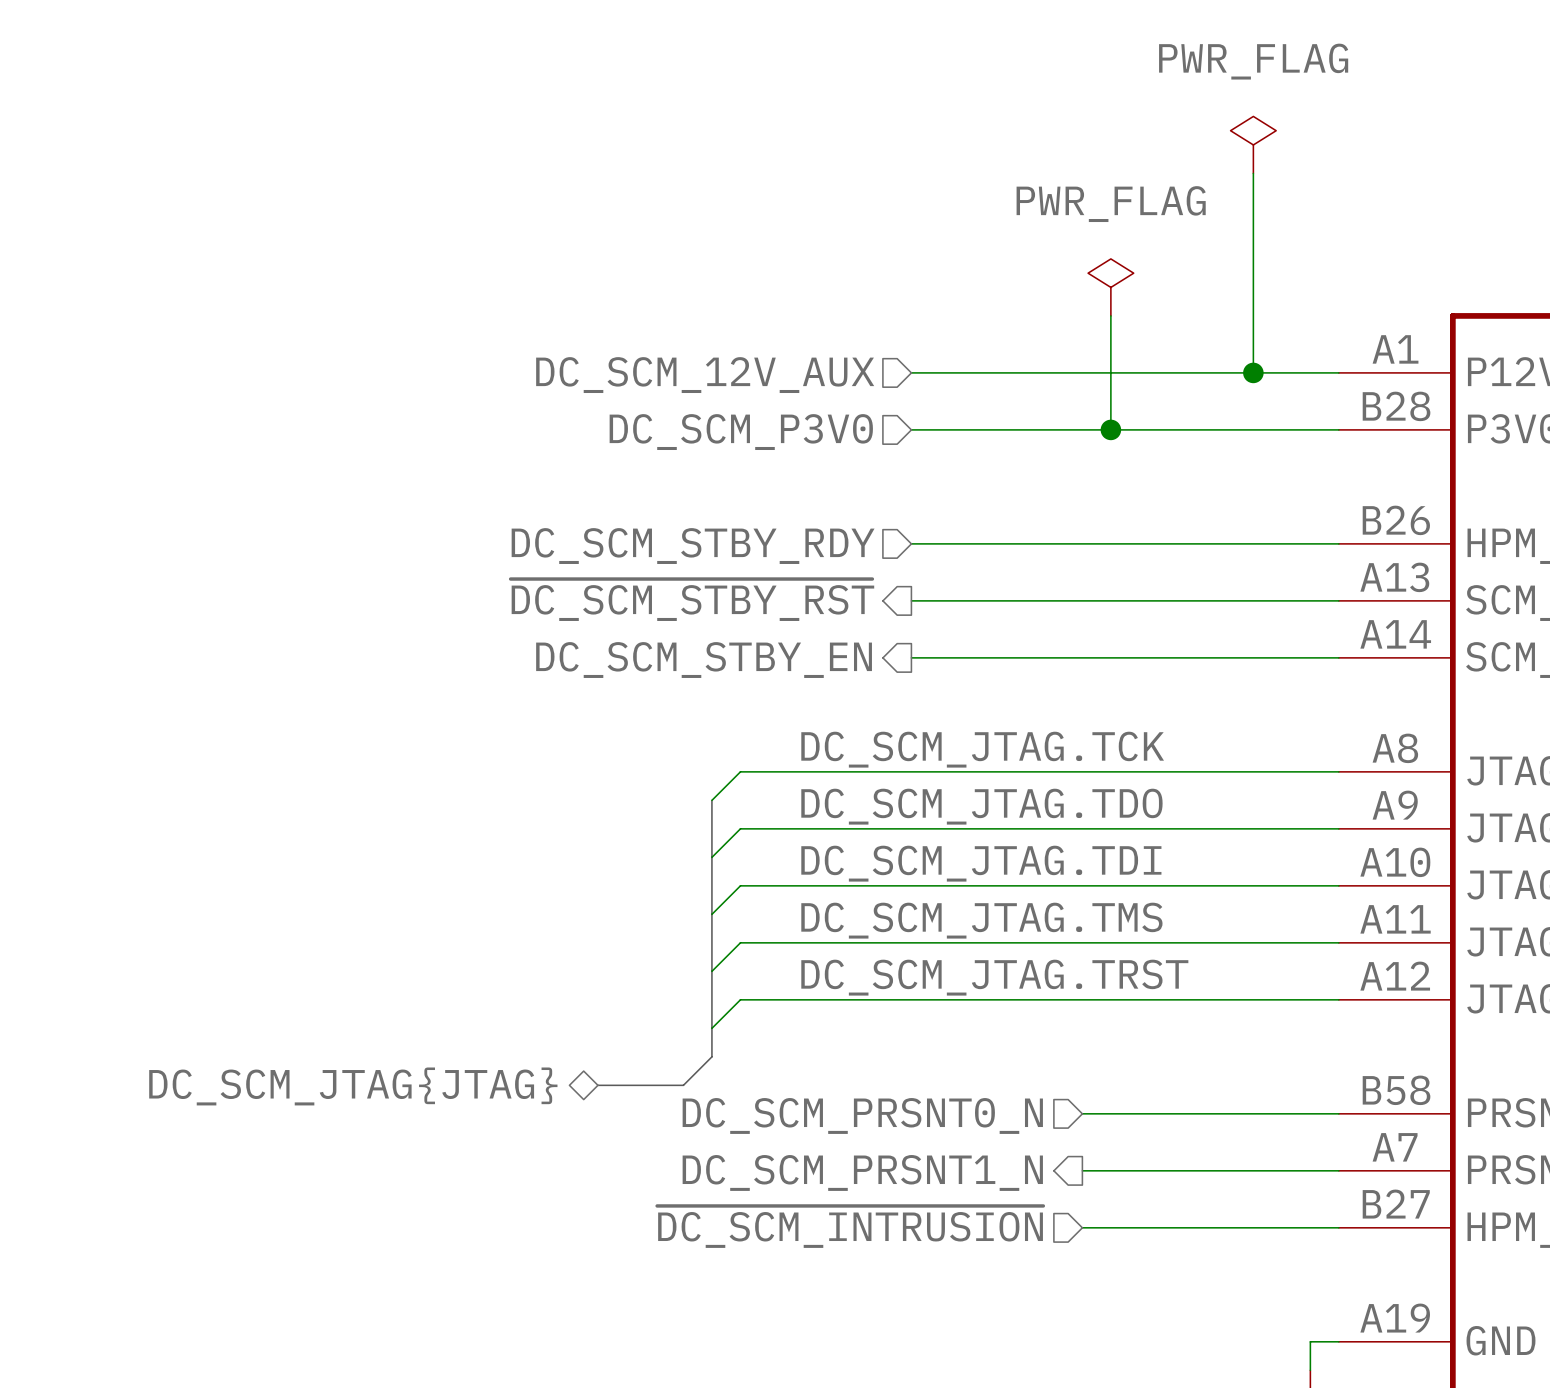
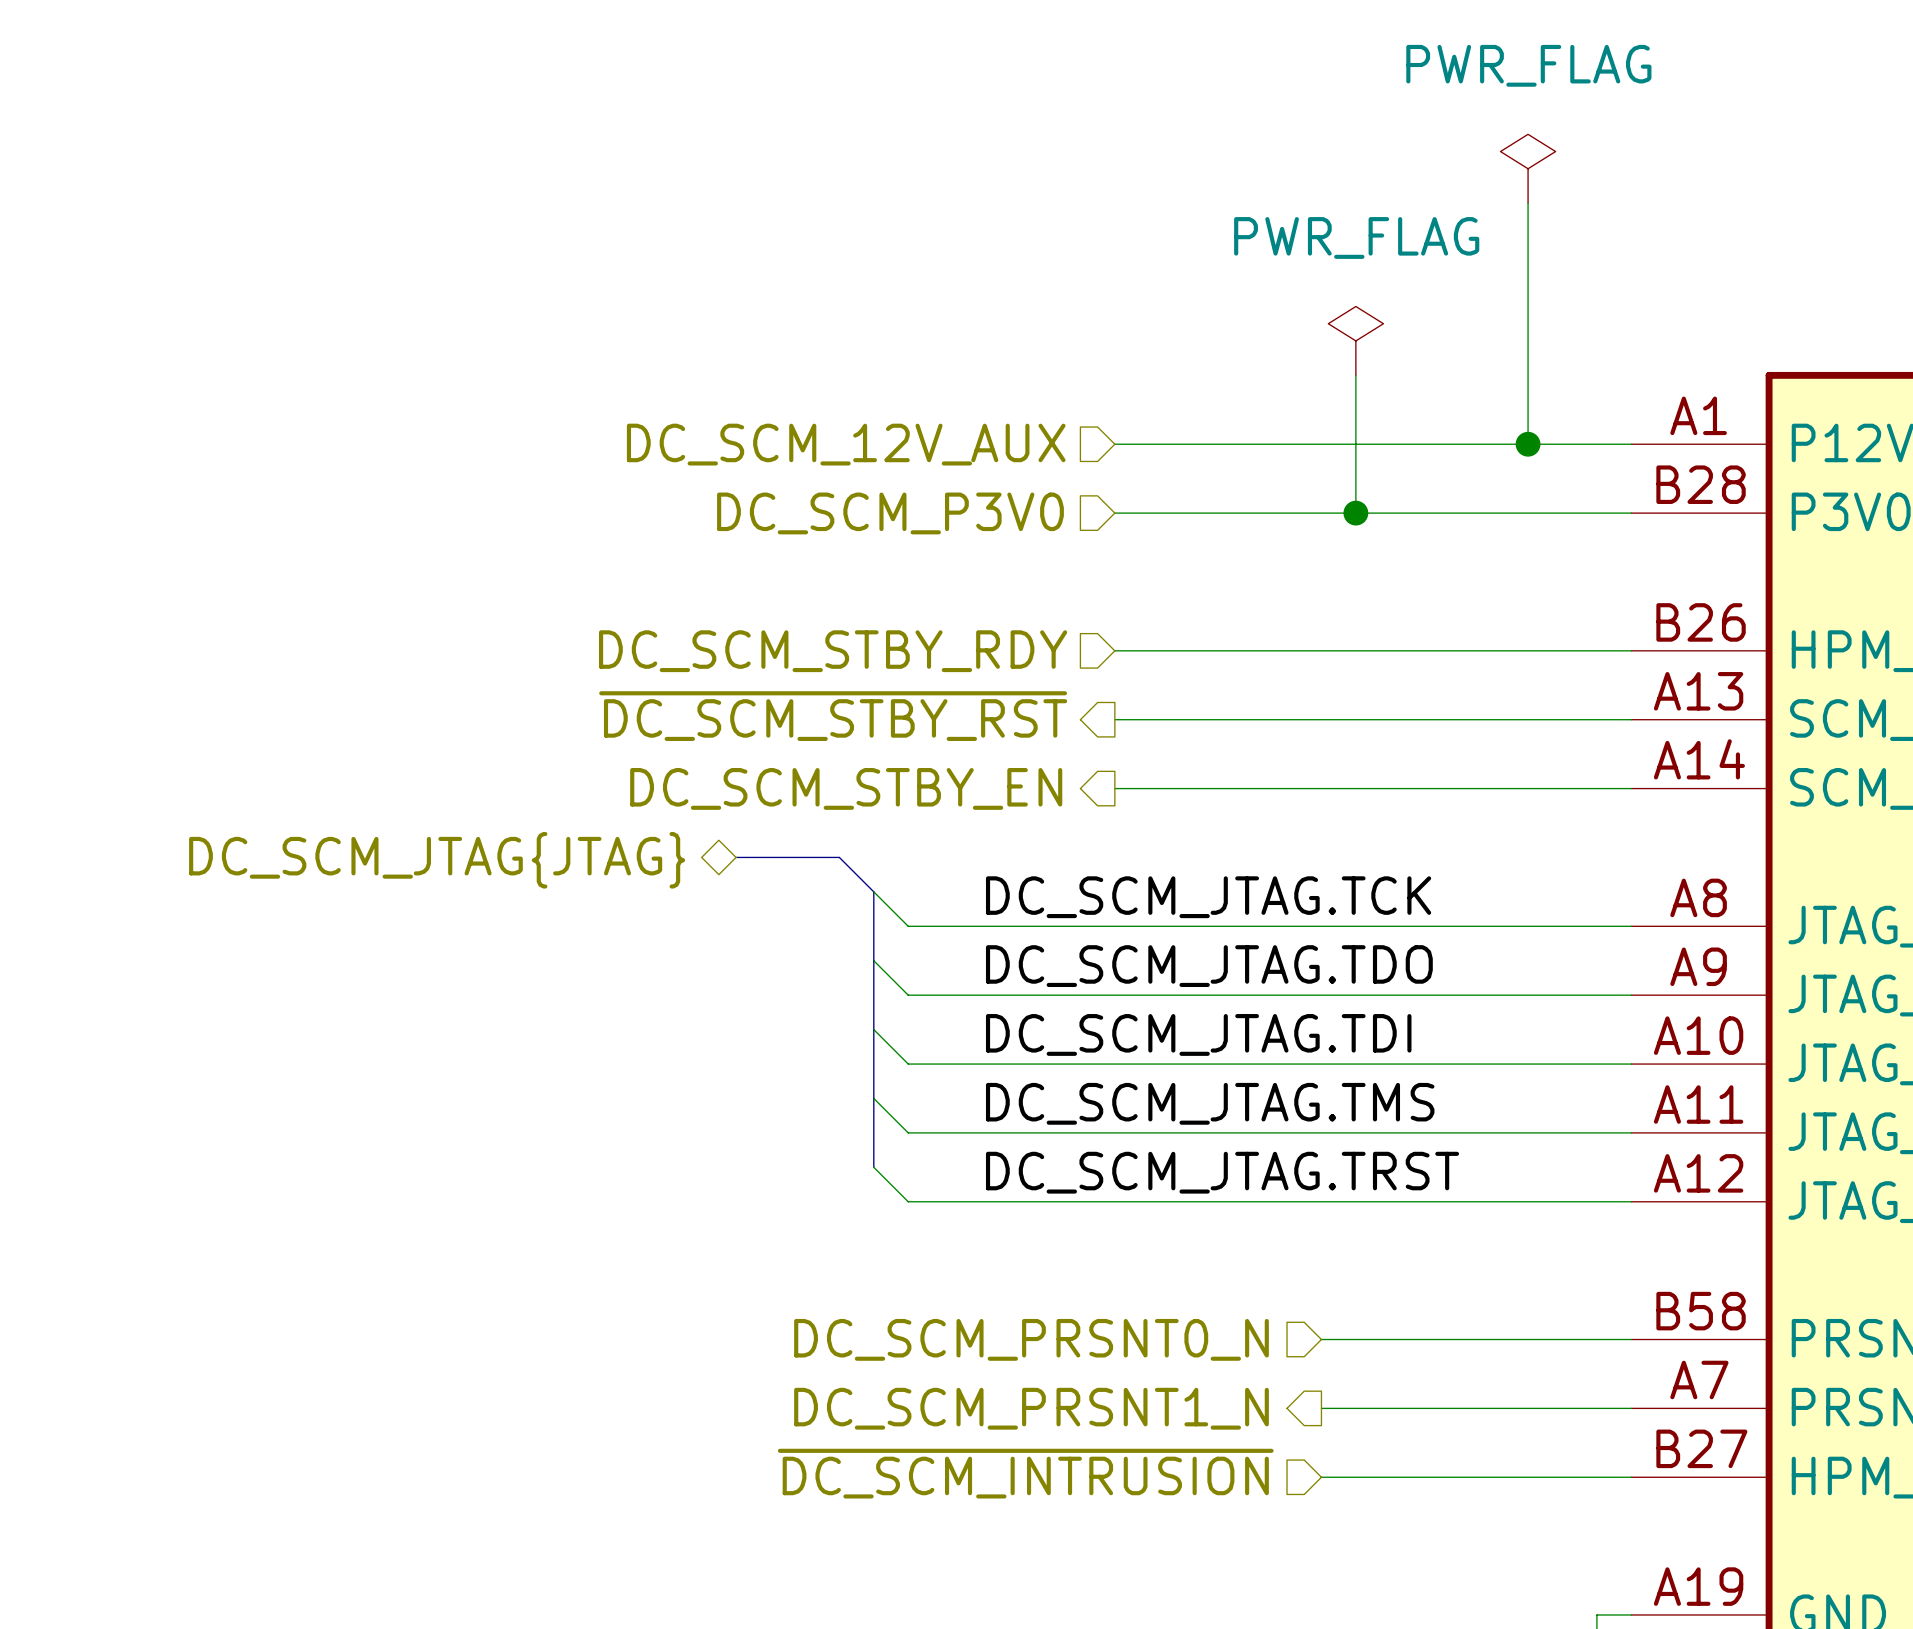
bus: none -> (736, 857) (839, 857) (873, 891) (873, 960)
wire: (740, 771) (711, 800) -> (908, 926) (873, 891)
wire: none -> (873, 960) (908, 995)
wire: (740, 828) (711, 857) -> (908, 1064) (873, 1029)
wire: (740, 885) (711, 914) -> (908, 1132) (873, 1098)
wire: (740, 942) (711, 971) -> (908, 1201) (873, 1167)
bus: (711, 971) (711, 1056) (683, 1085) (597, 1085) -> none
wire: (740, 999) (711, 1028) -> none
hierarchical label position: DC_SCM_JTAG{JTAG} (353, 1086) -> DC_SCM_JTAG{JTAG} (437, 860)

